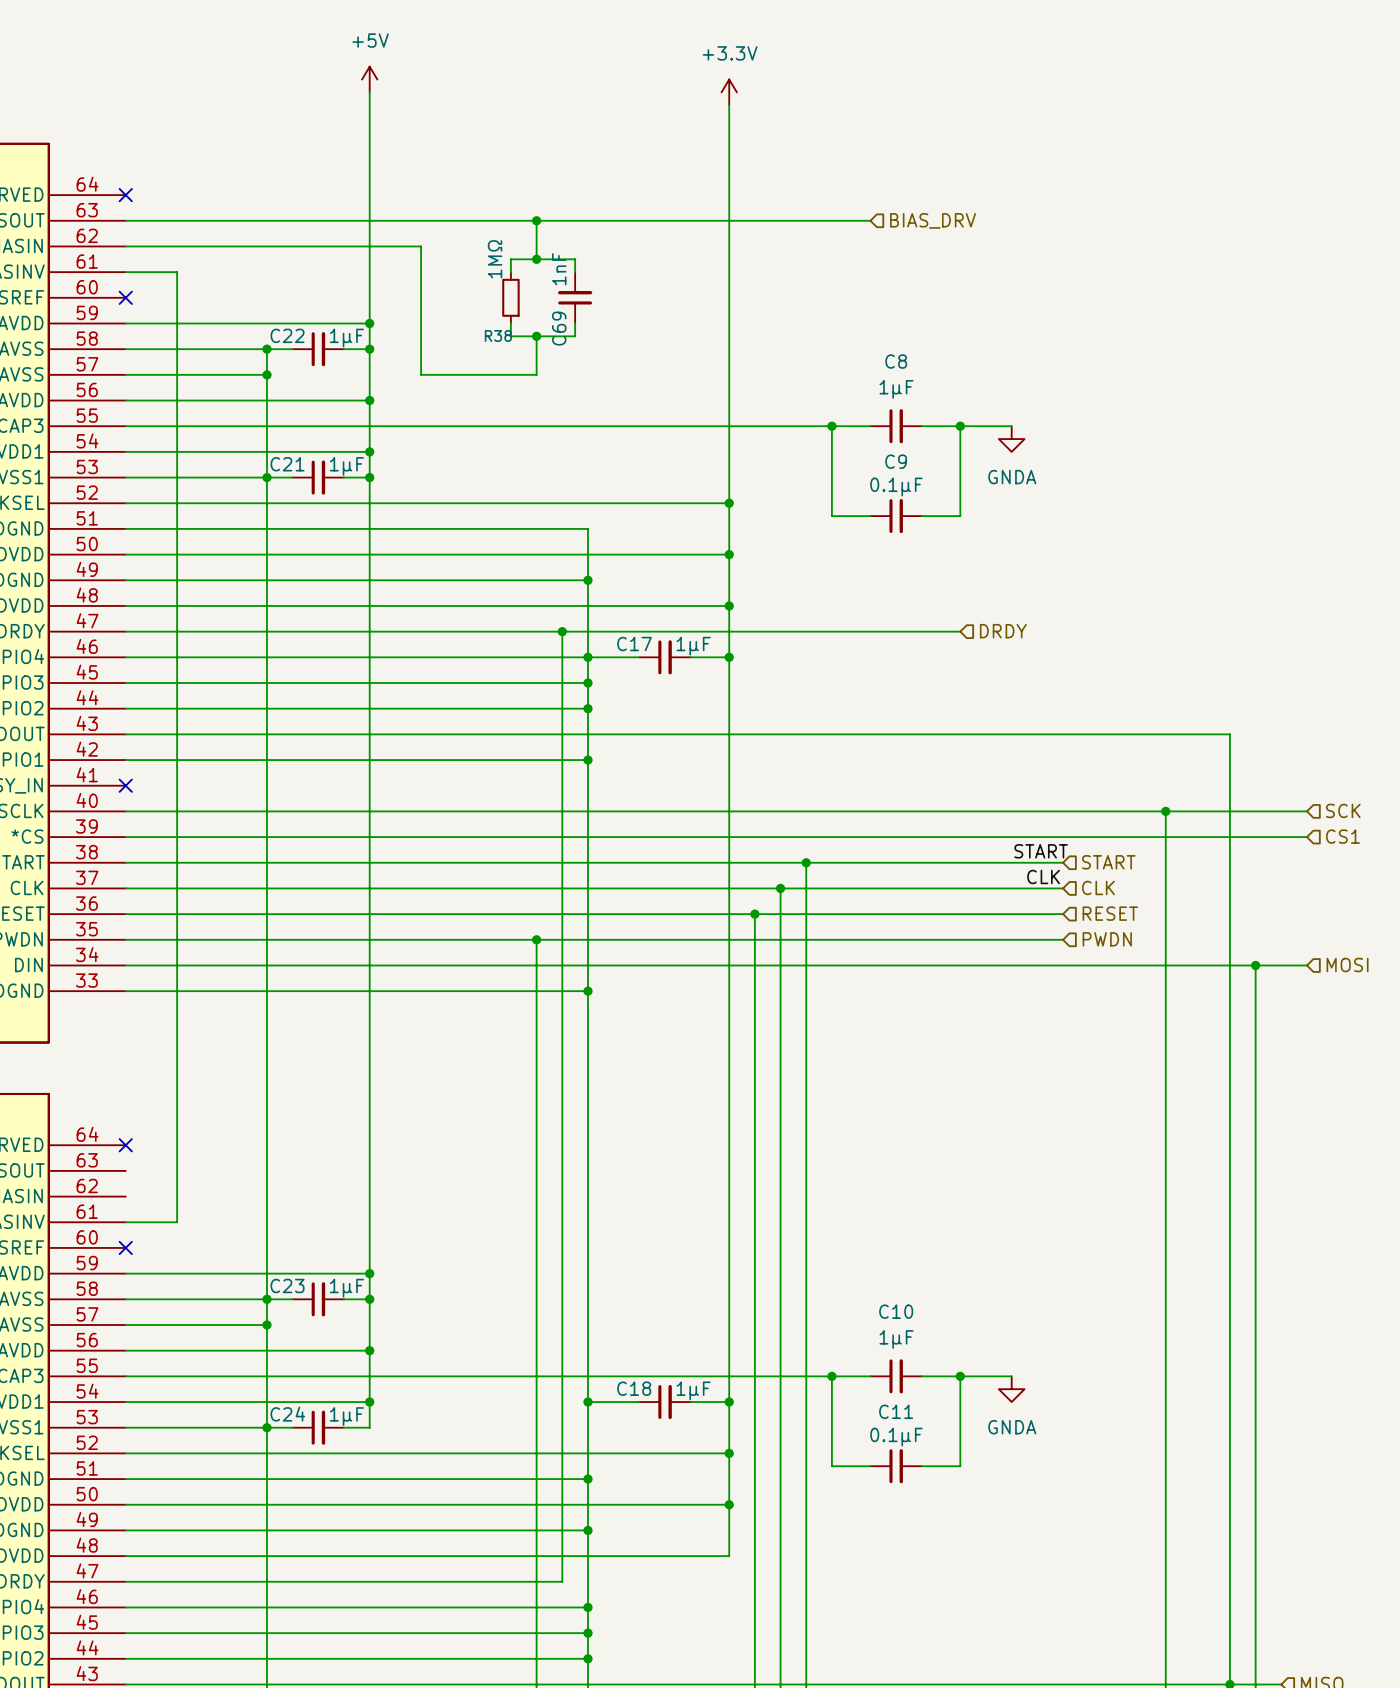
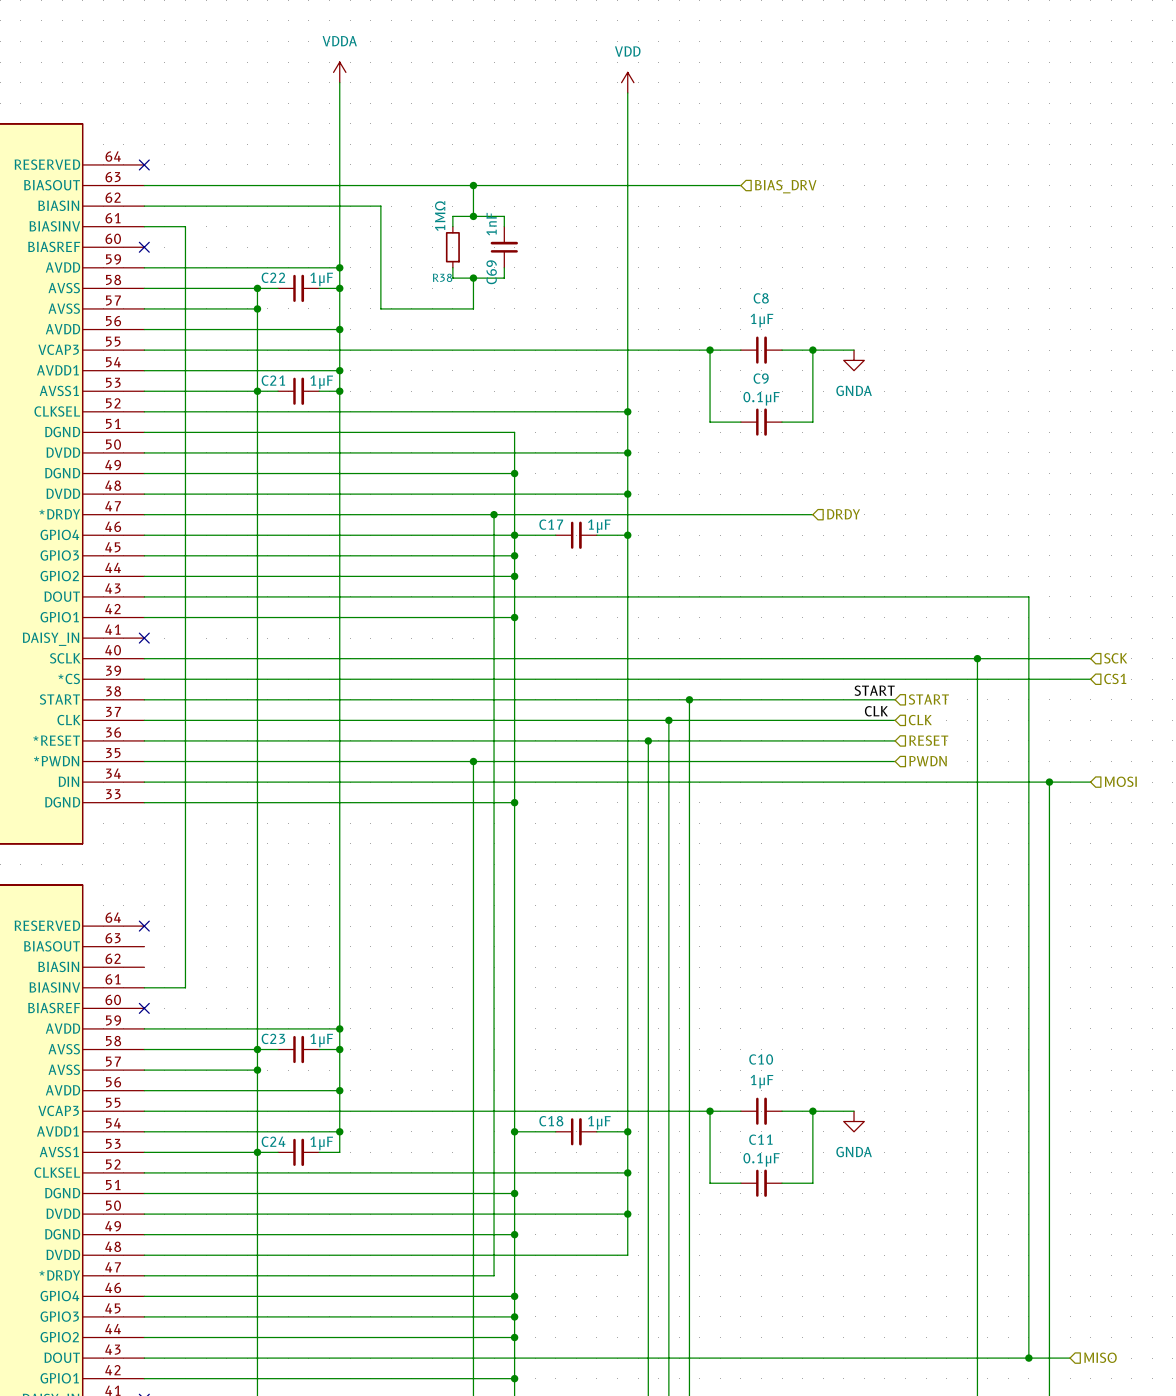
power symbol: +5V (369, 79) -> VDDA (339, 72)
power symbol: +3.3V (729, 92) -> VDD (627, 82)

